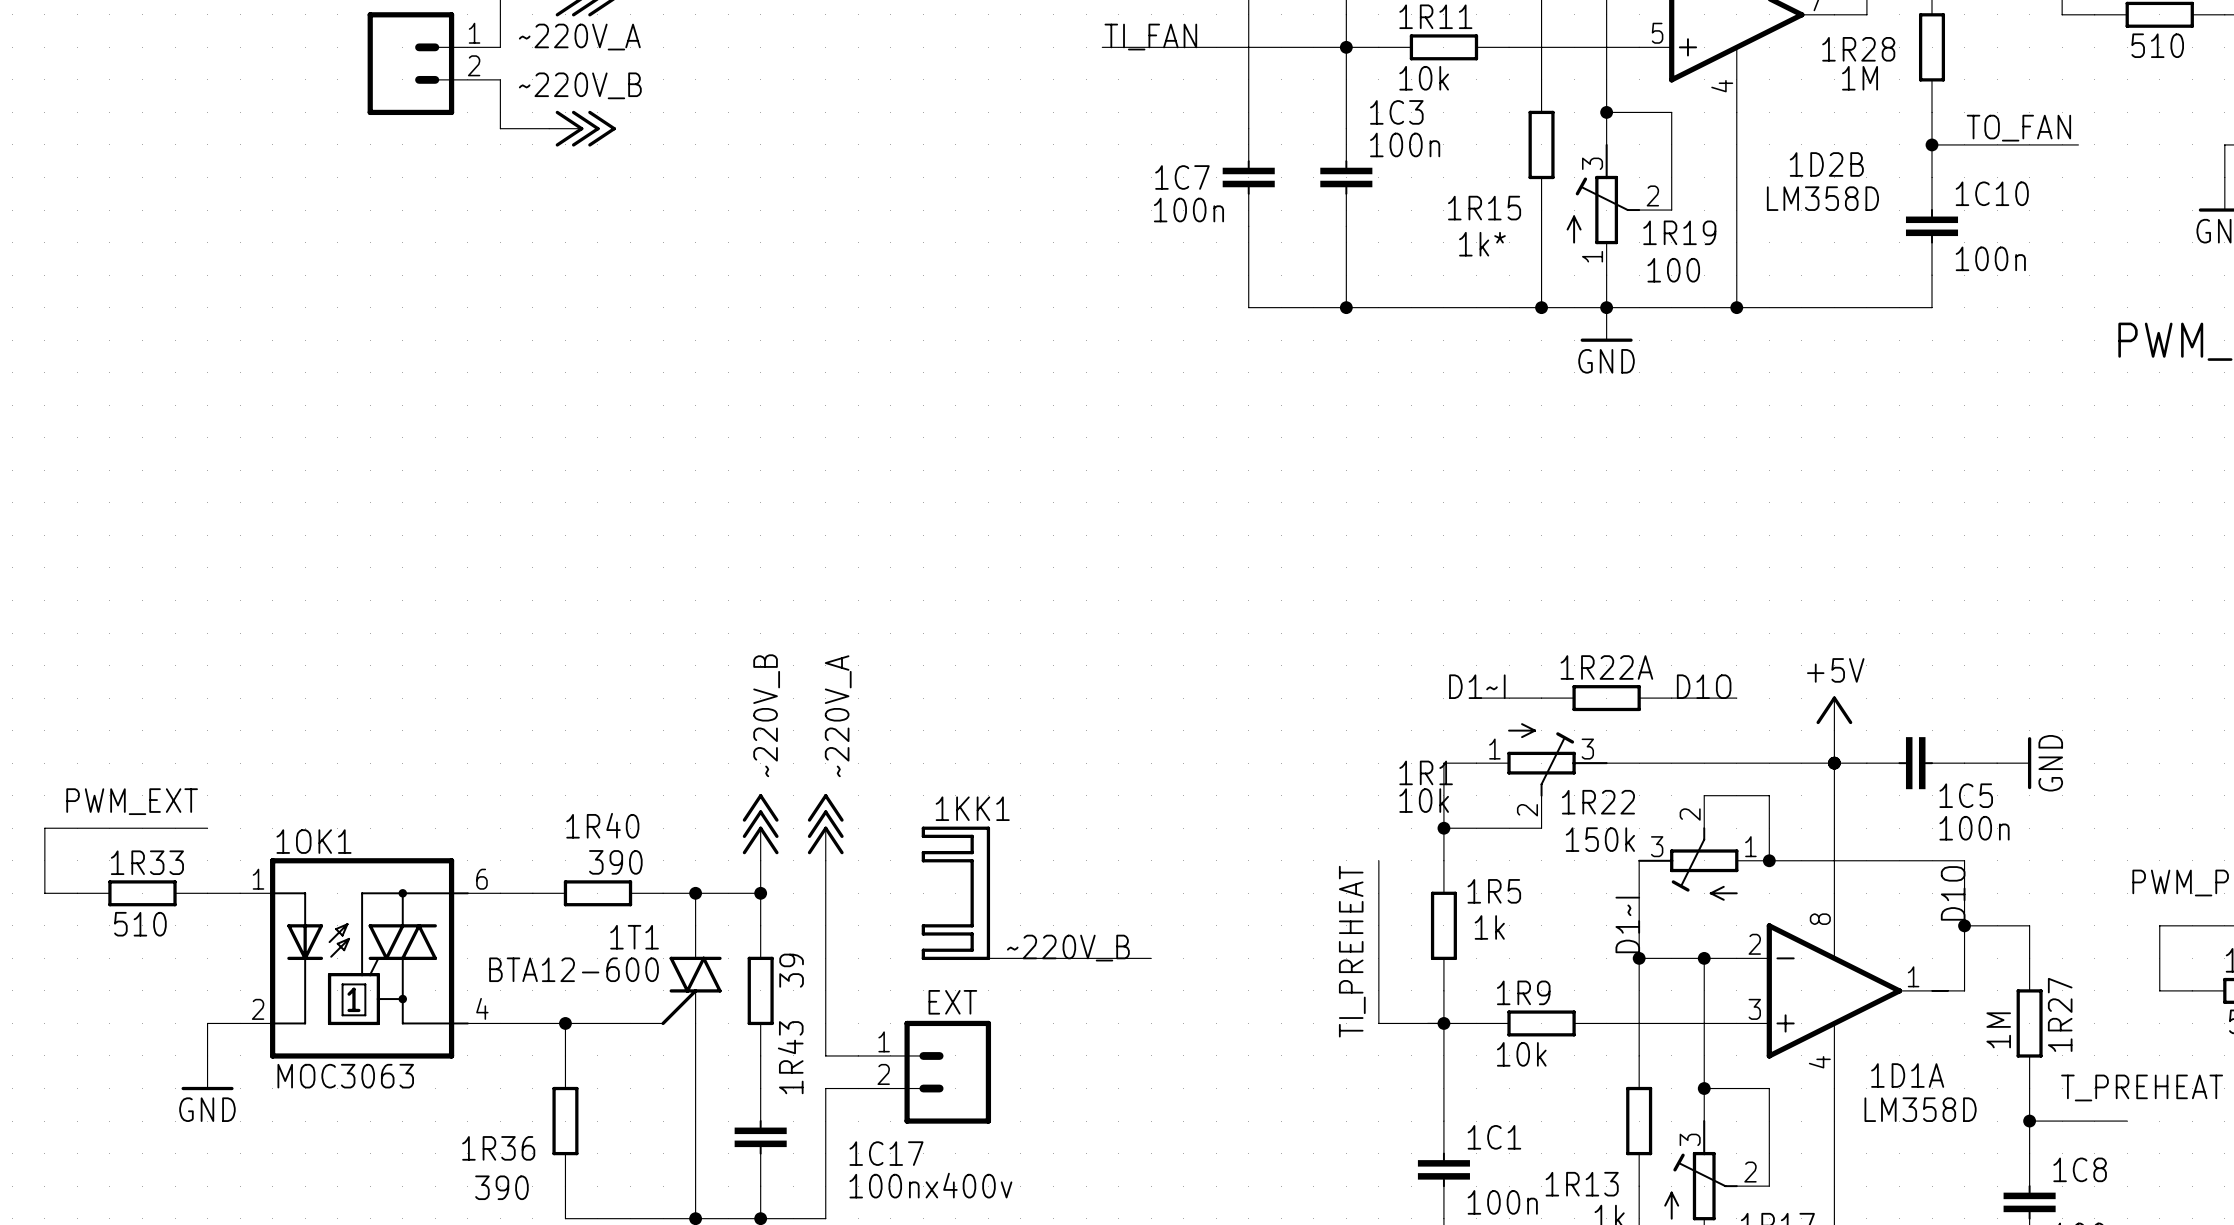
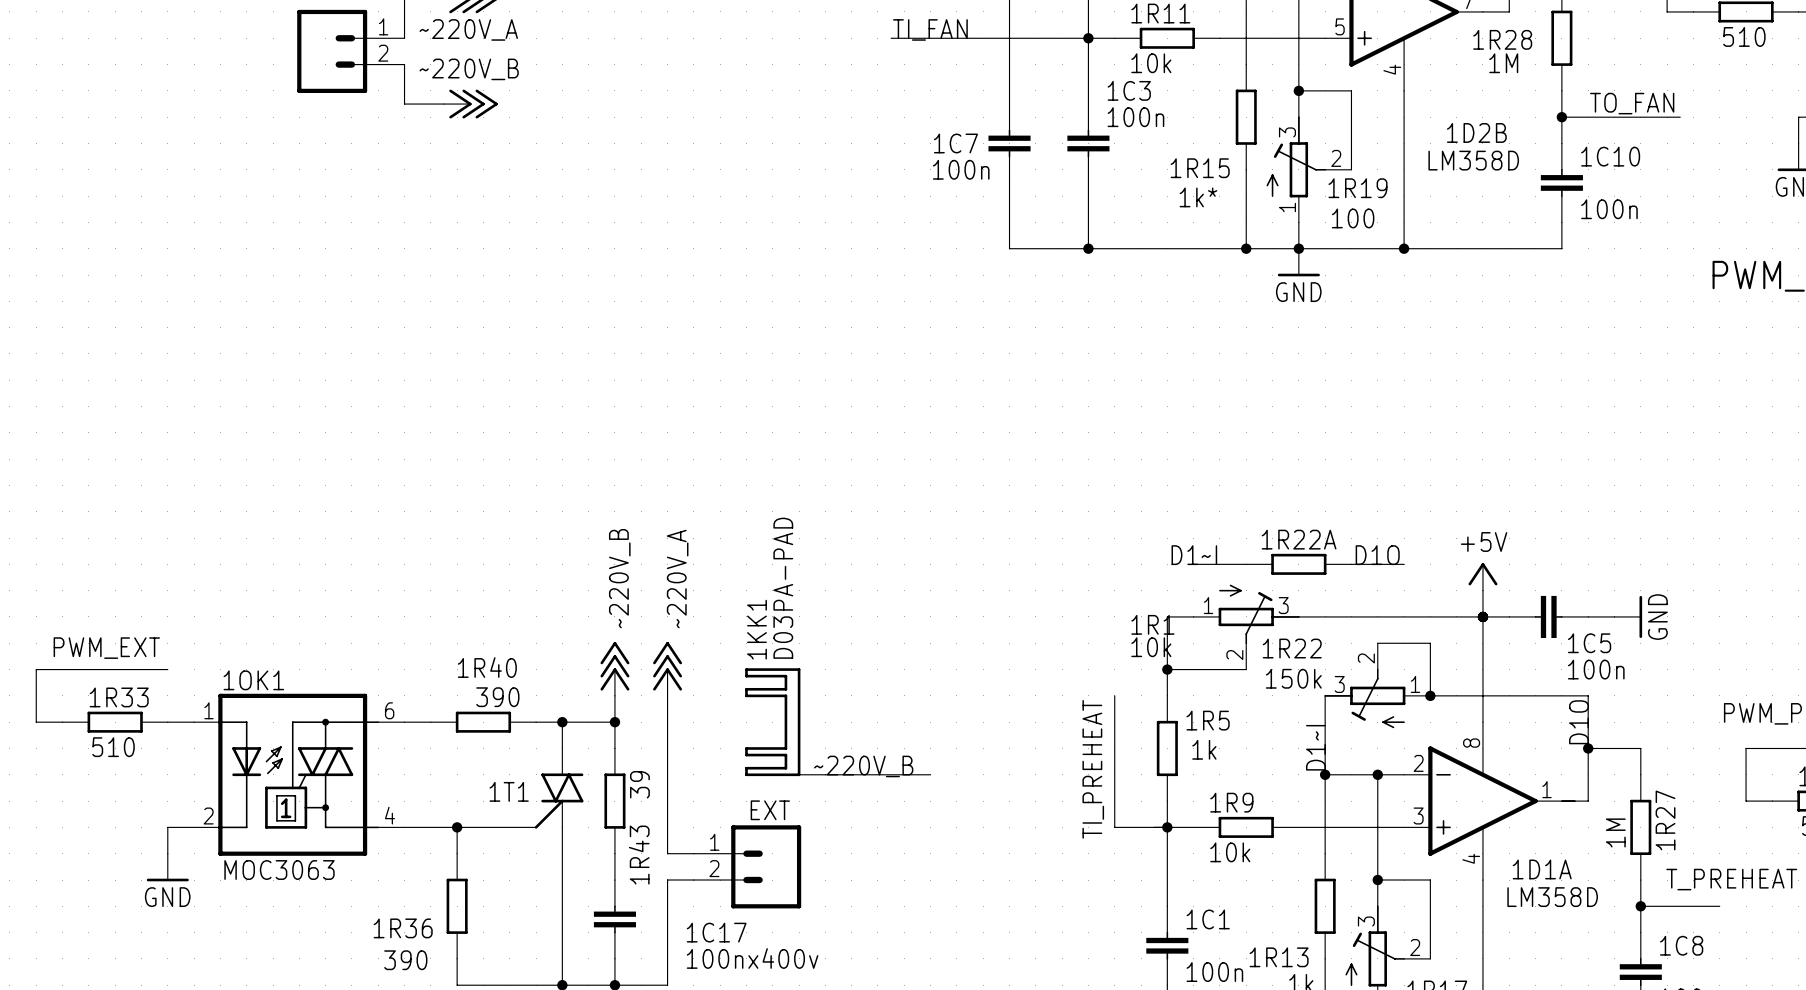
1KK1 value: none -> D03PA-PAD (783, 588)
1KK1 name rotation: 0° (972, 808) -> 90° counterclockwise (757, 629)
1T1 name position: 1T1 (634, 937) -> 1T1 (509, 791)
1T1 value: BTA12-600 (574, 969) -> none

